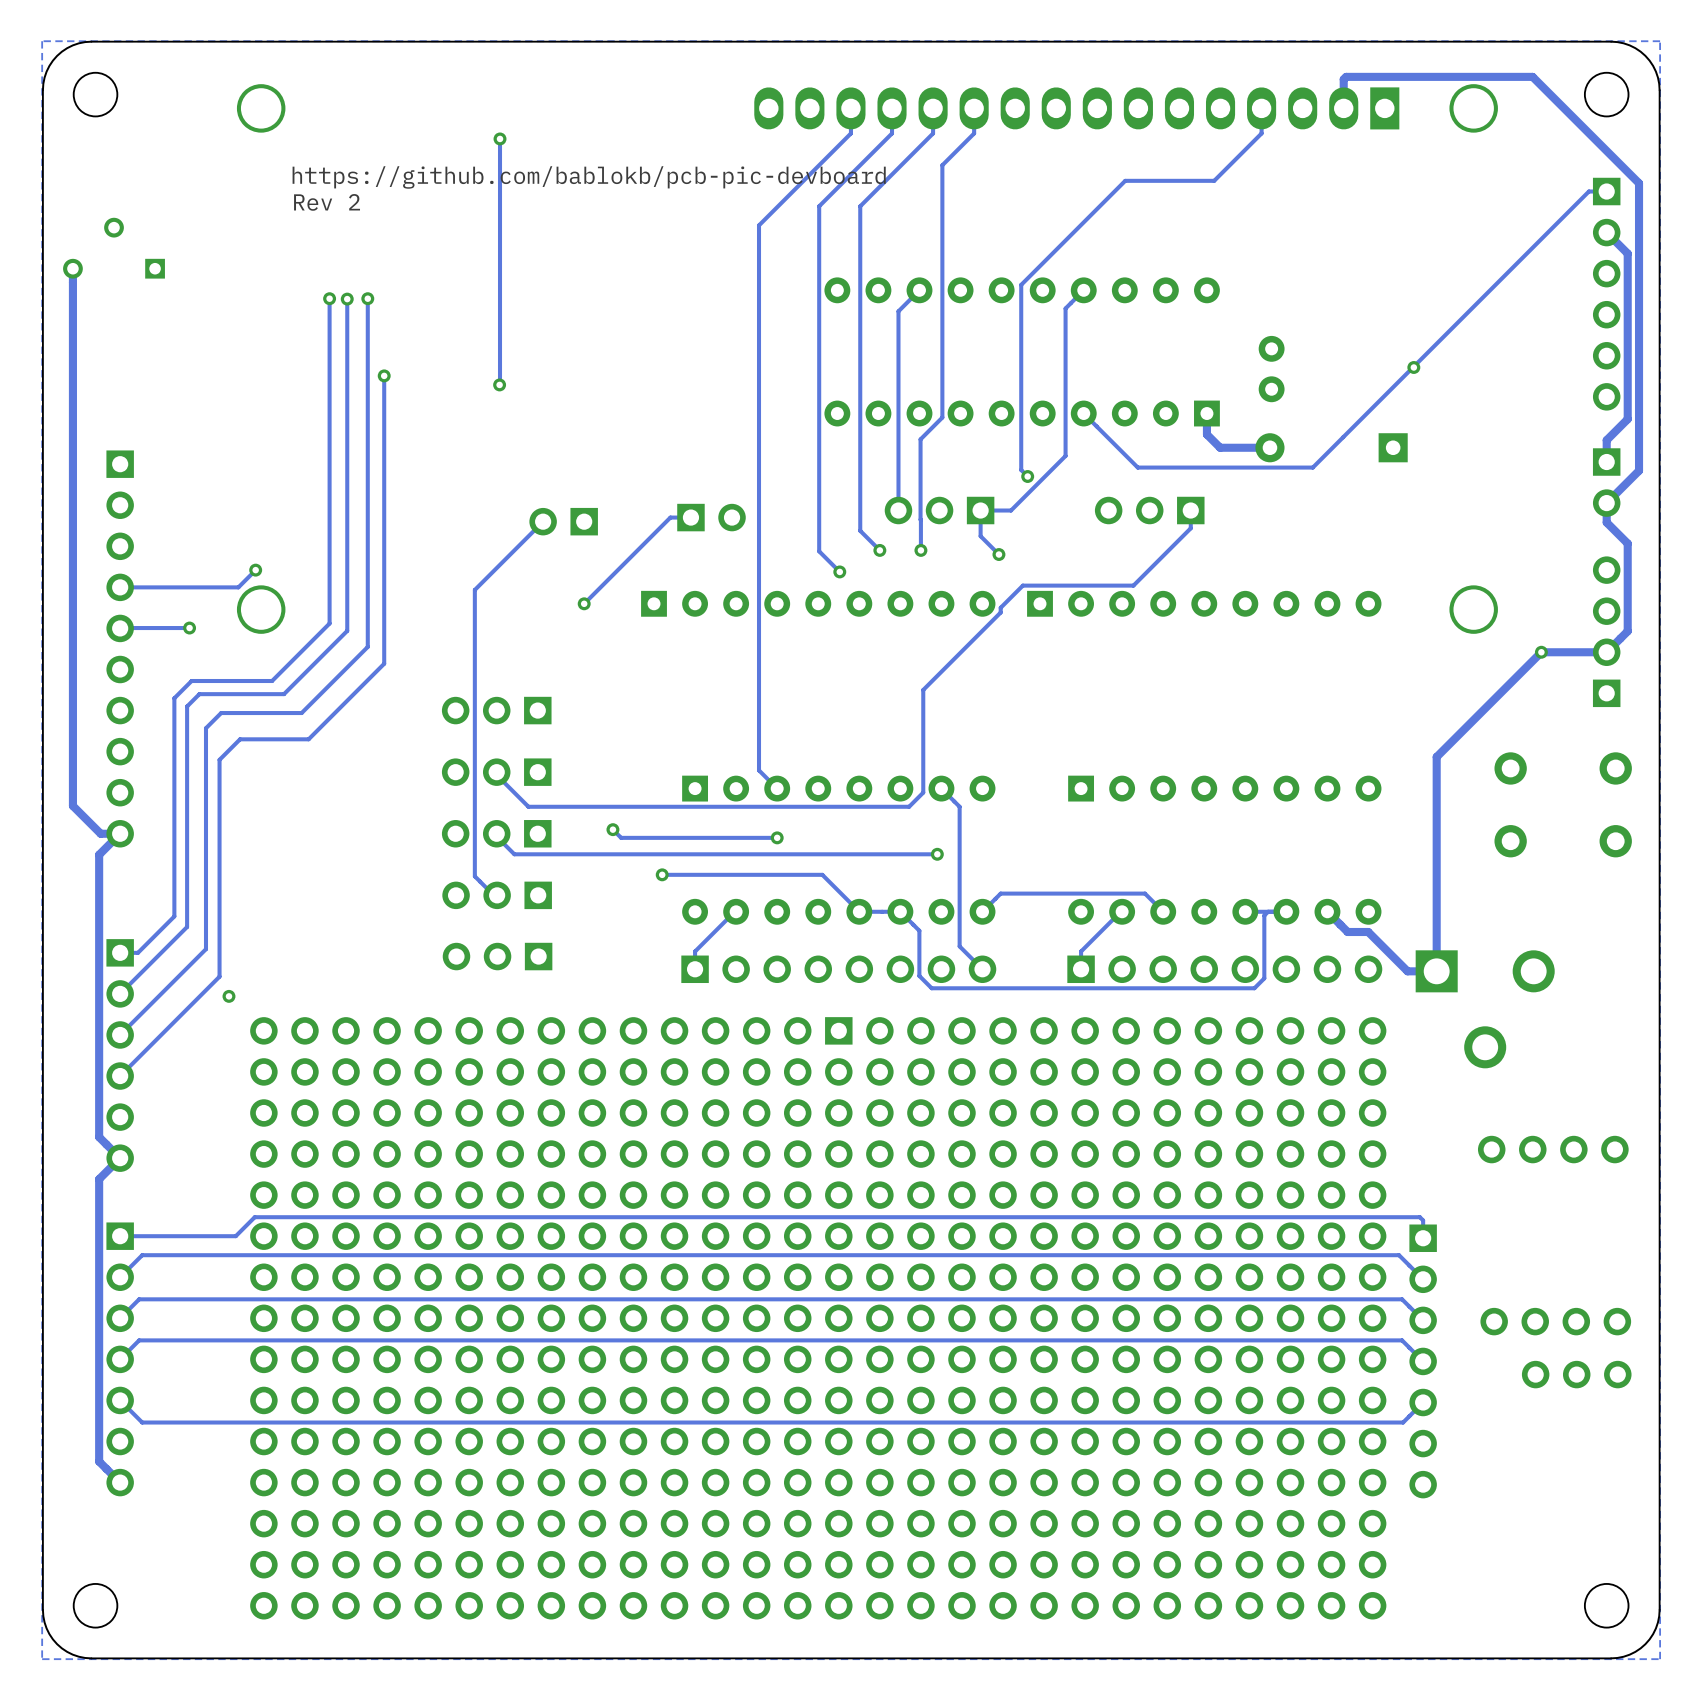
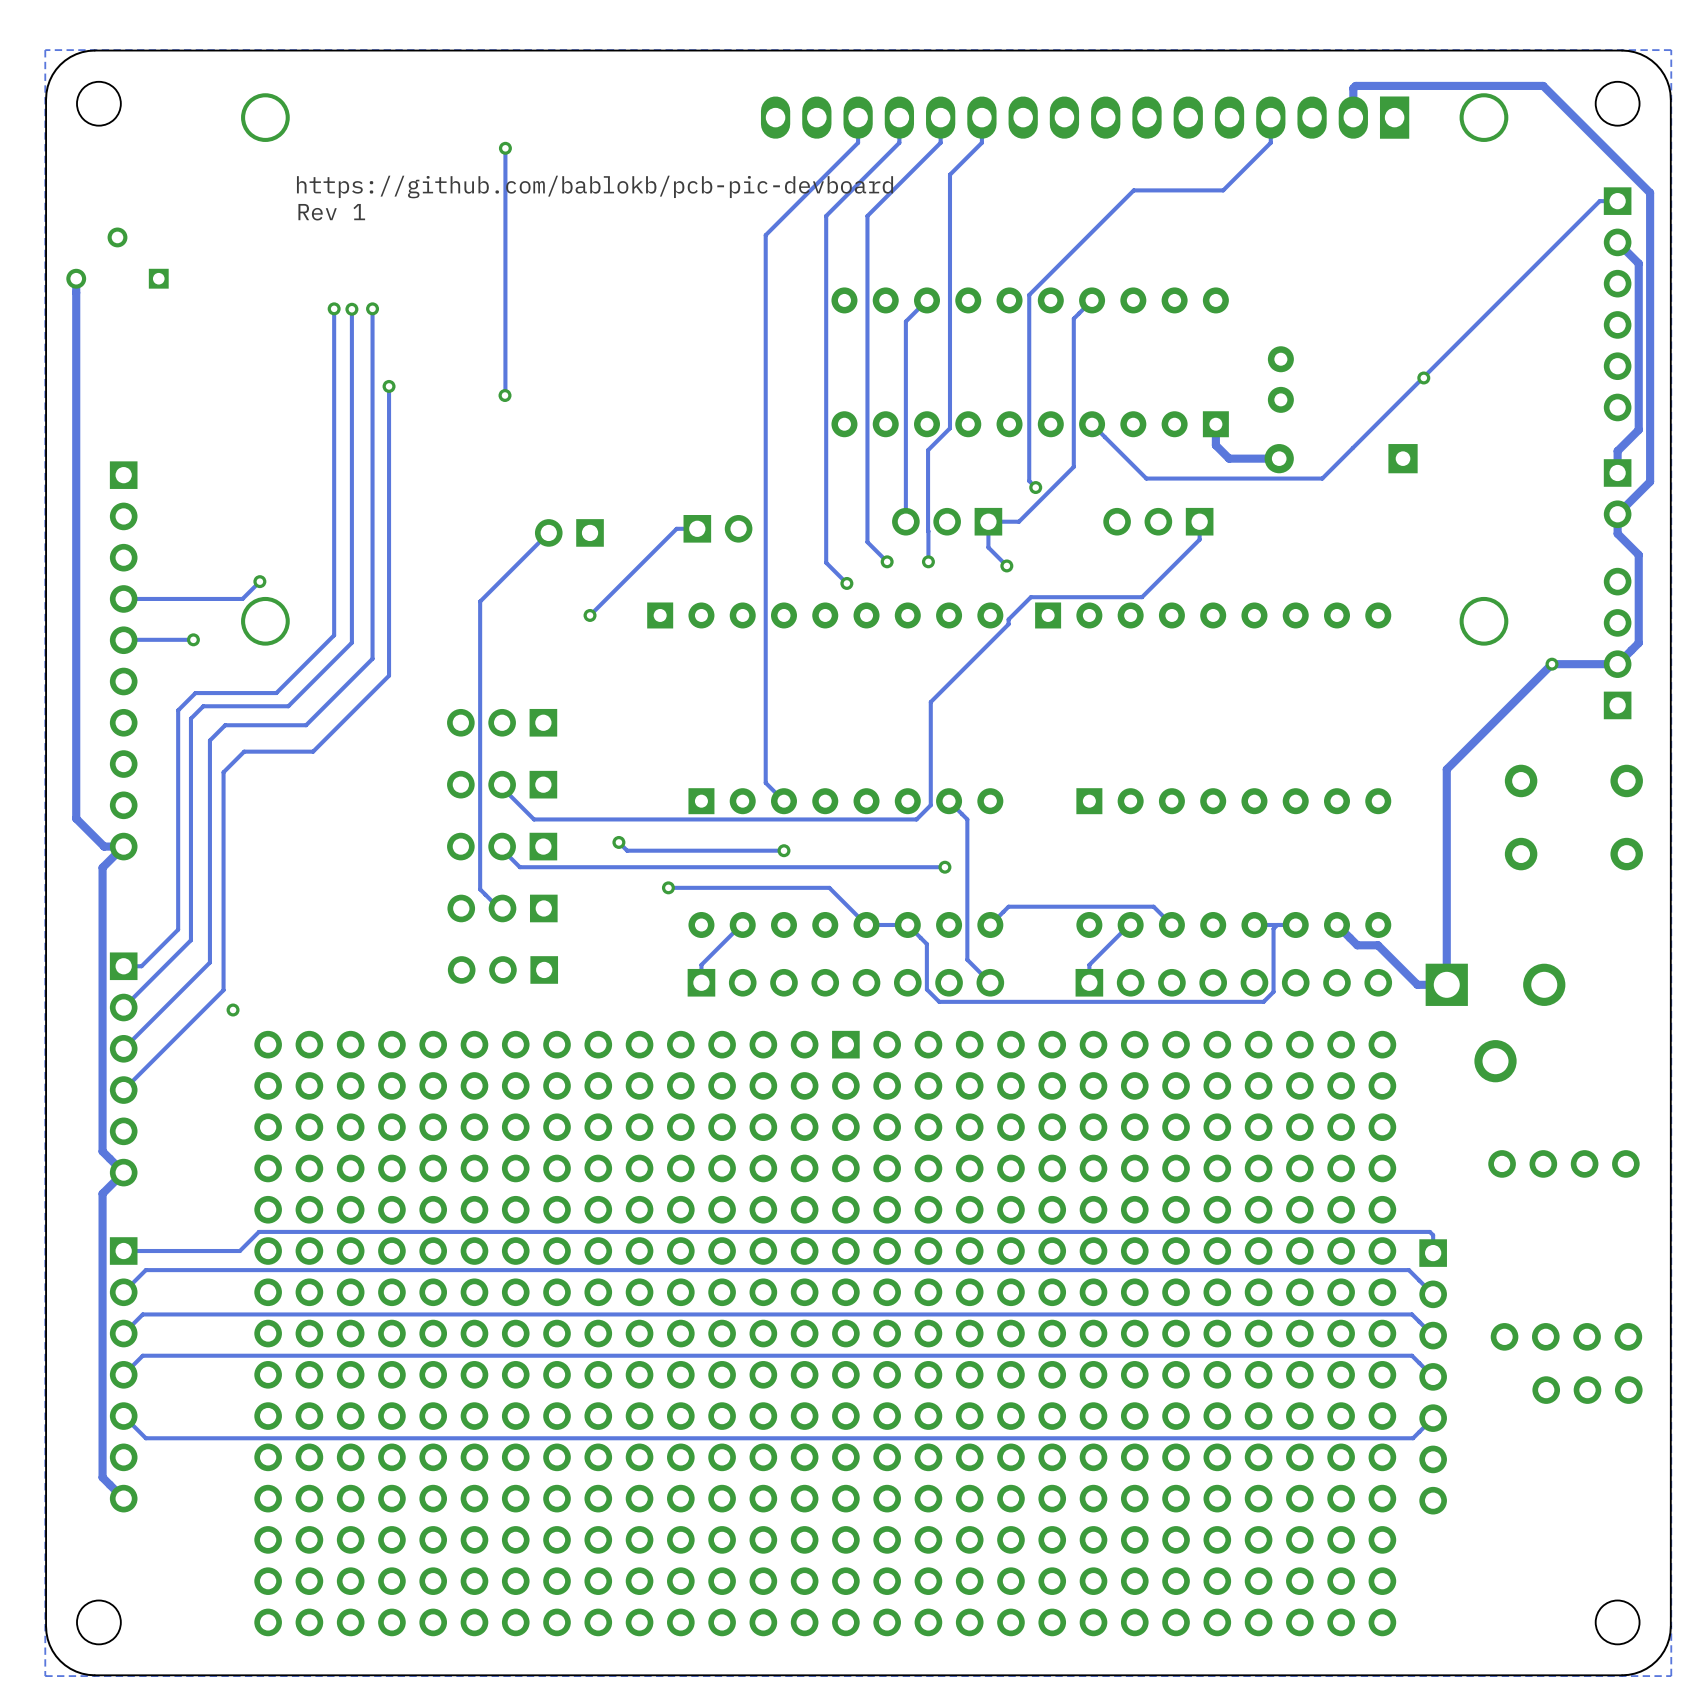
text: Rev 2 (327, 202) -> Rev 1 (331, 212)

